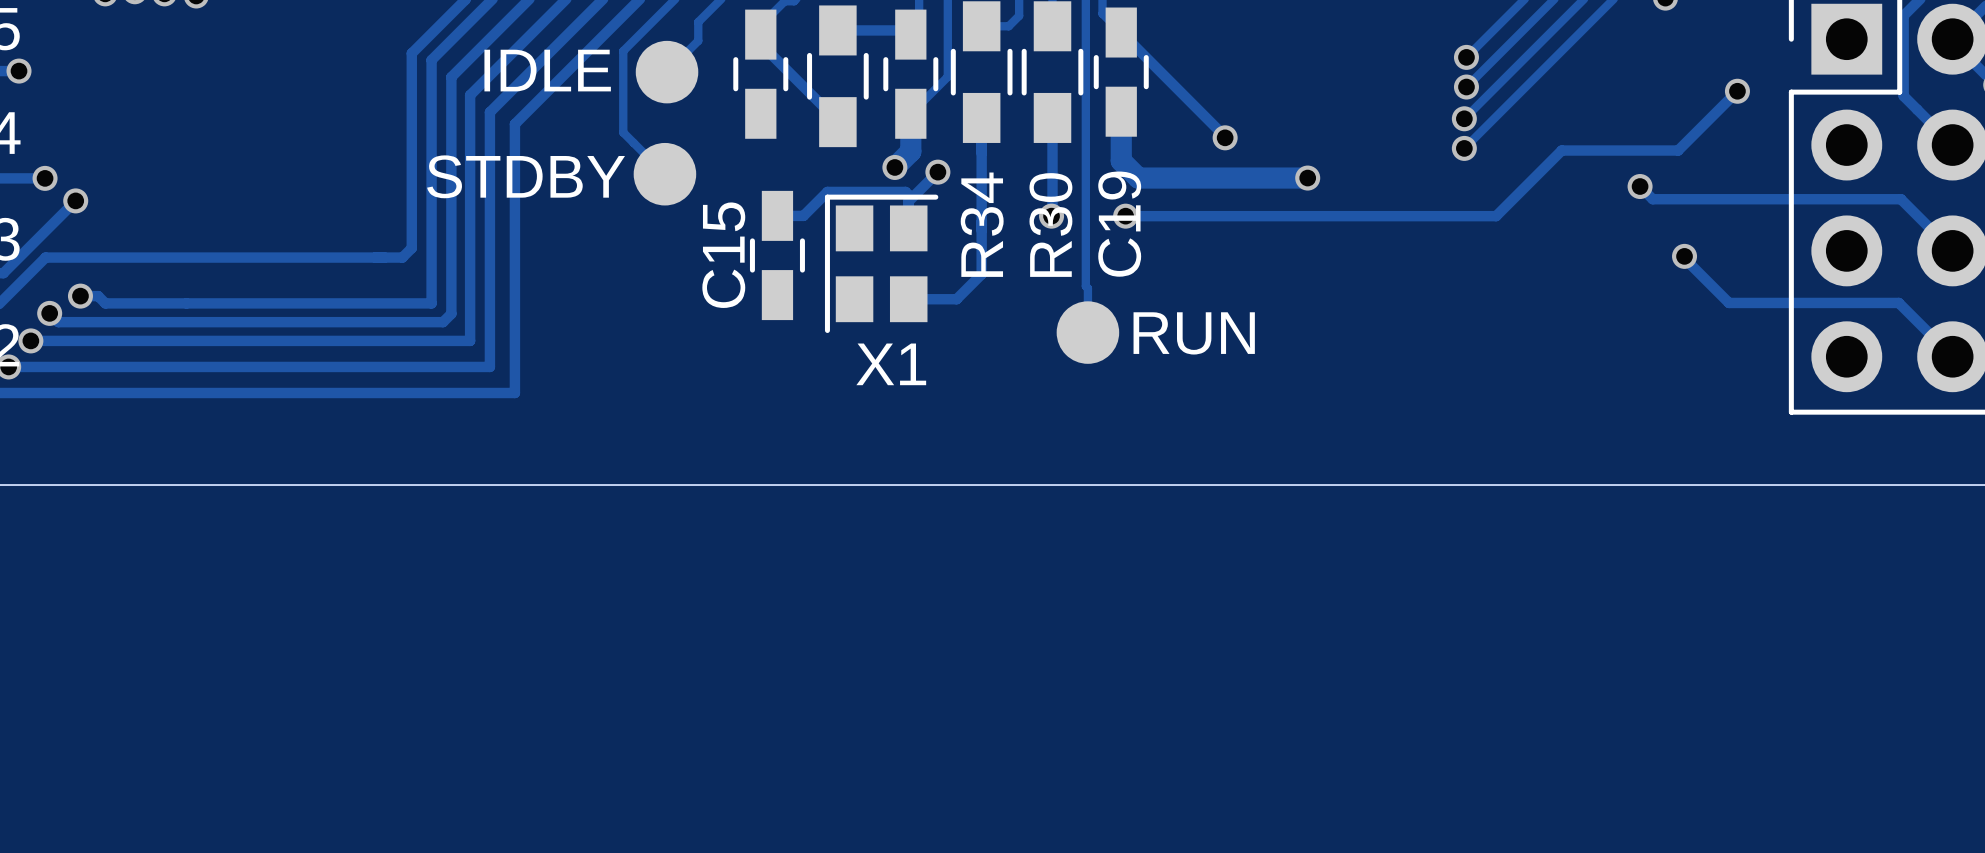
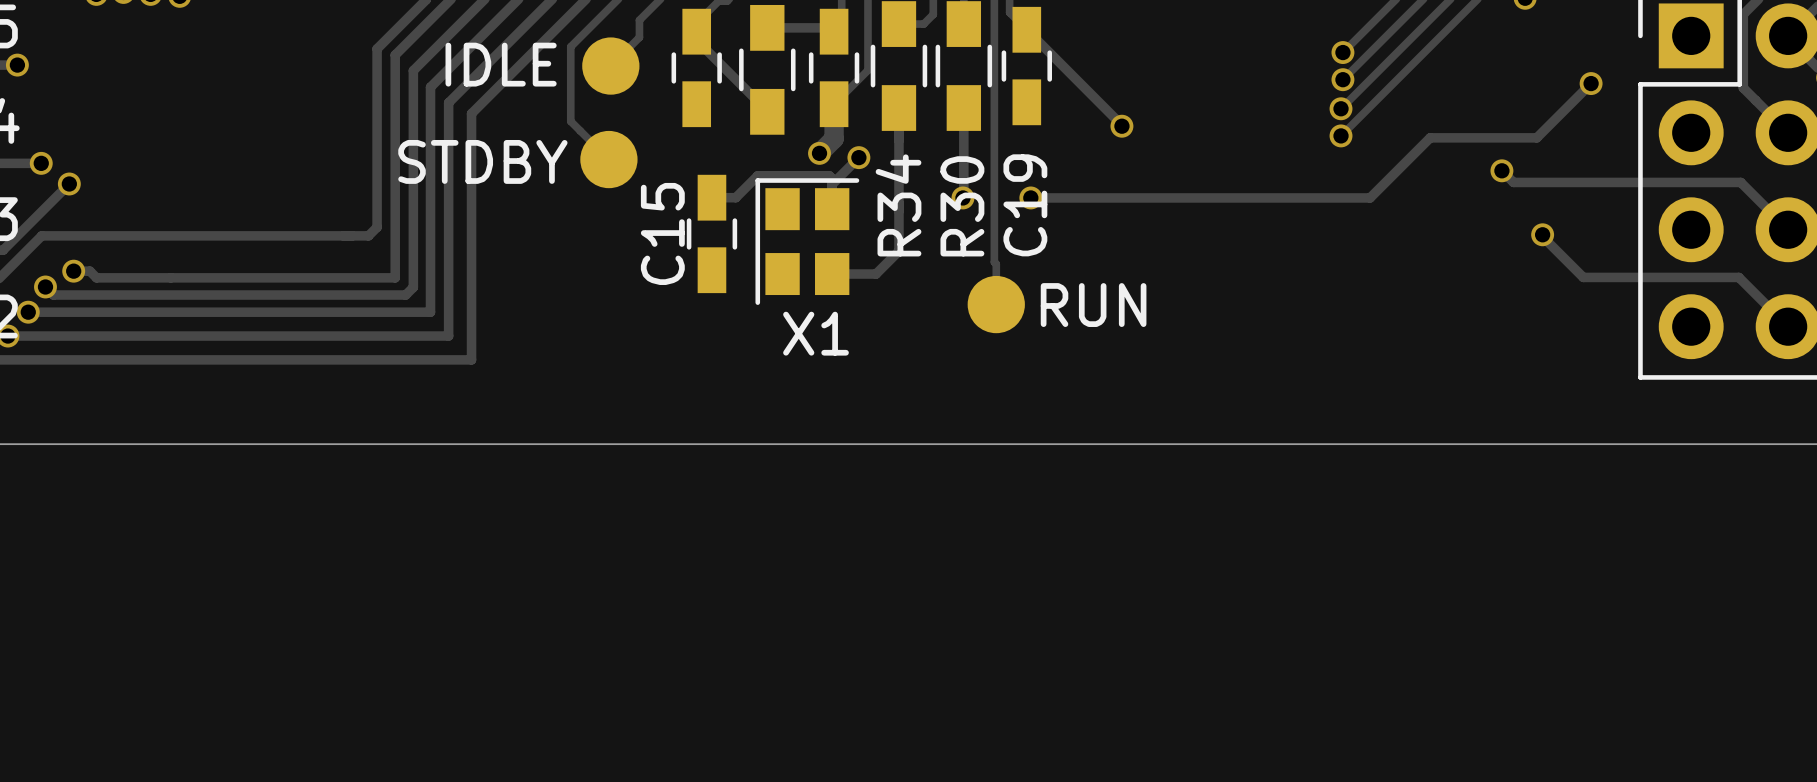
track: (1121, 111) (1121, 160) (1138, 178) (1307, 178) -> none
via: (1307, 178) -> none

